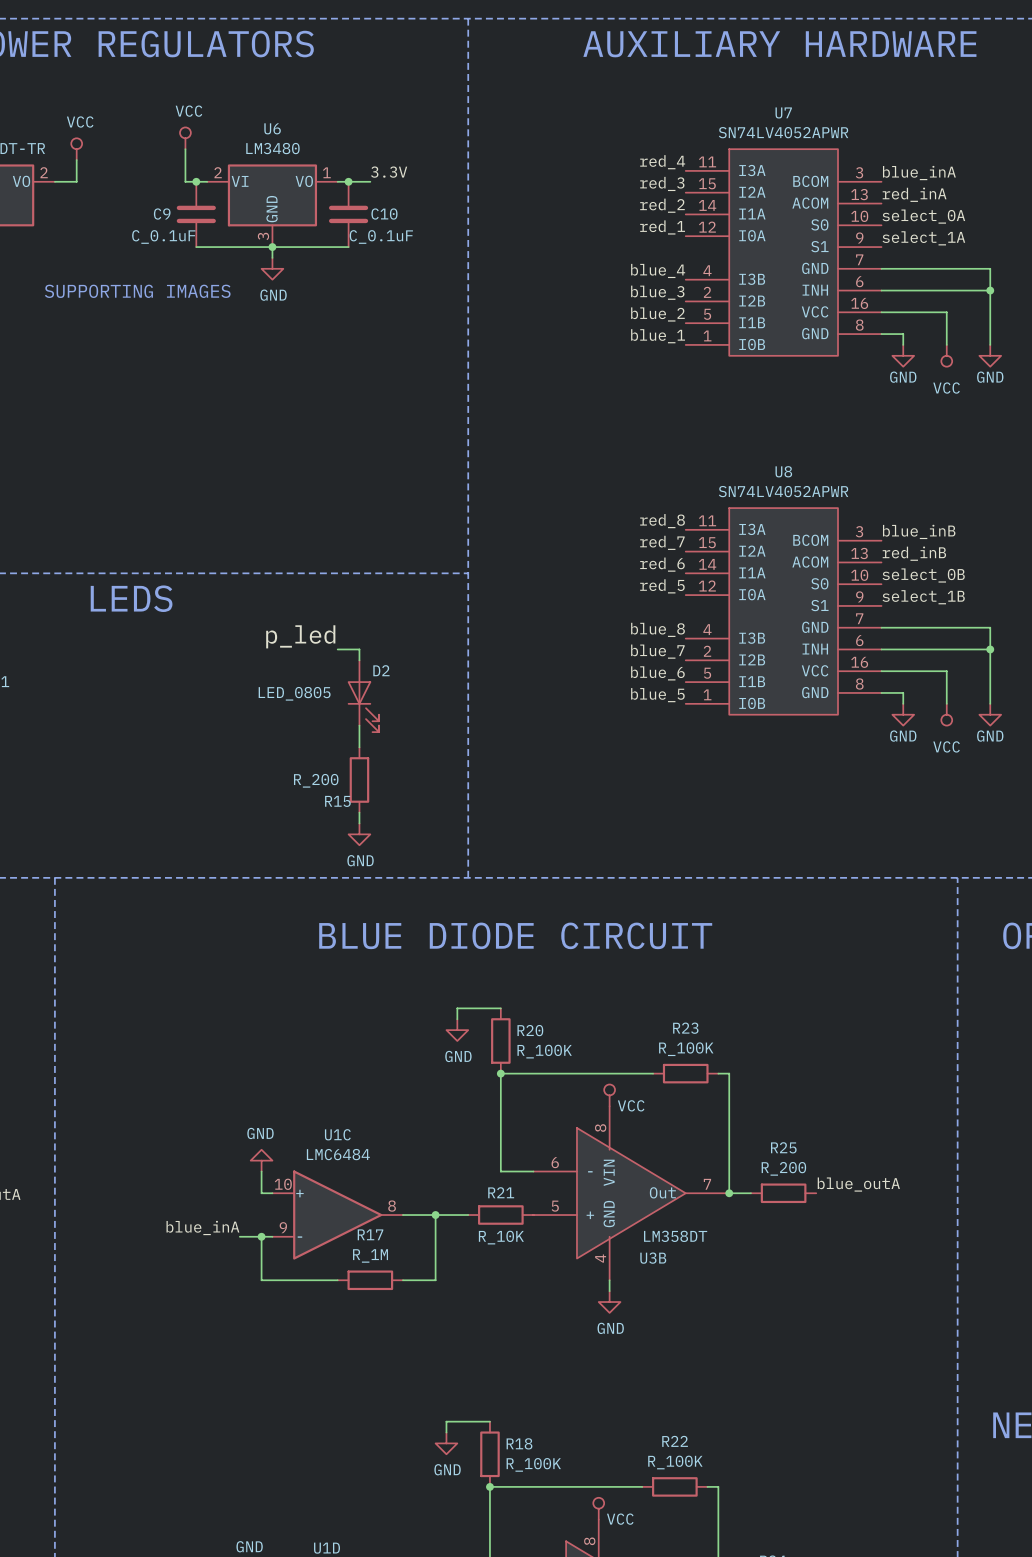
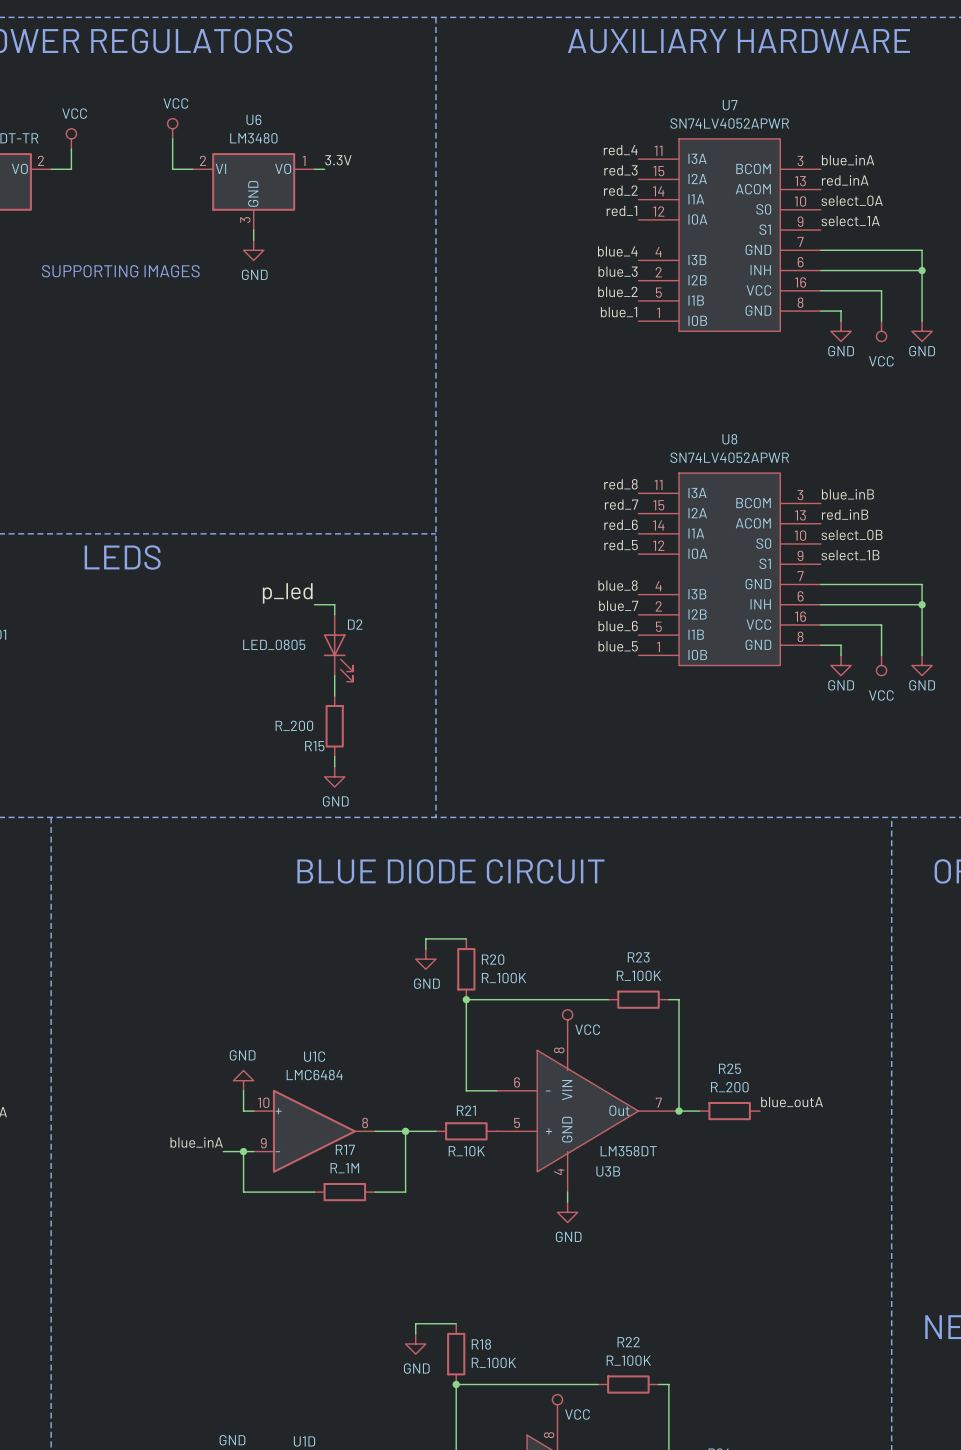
label position: 3.3V (389, 172) -> 3.3V (338, 160)
junction: (196, 181) -> none
wire: (348, 181) (370, 181) -> none
junction: (348, 181) -> none
C9: C_0.1uF (196, 214) -> none
C10: C_0.1uF (348, 214) -> none
wire: (196, 247) (348, 247) -> none
junction: (272, 247) -> none

